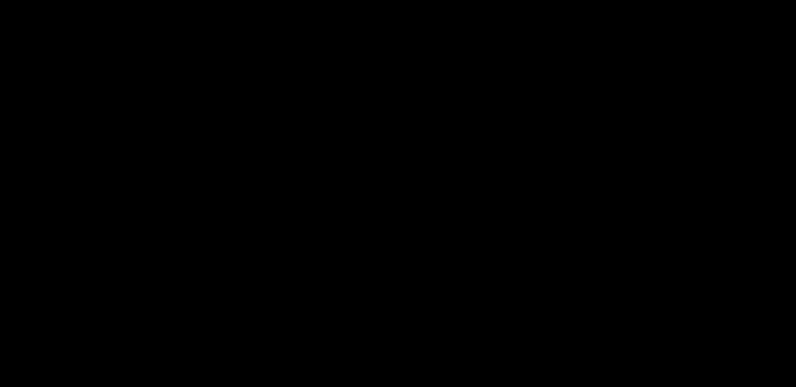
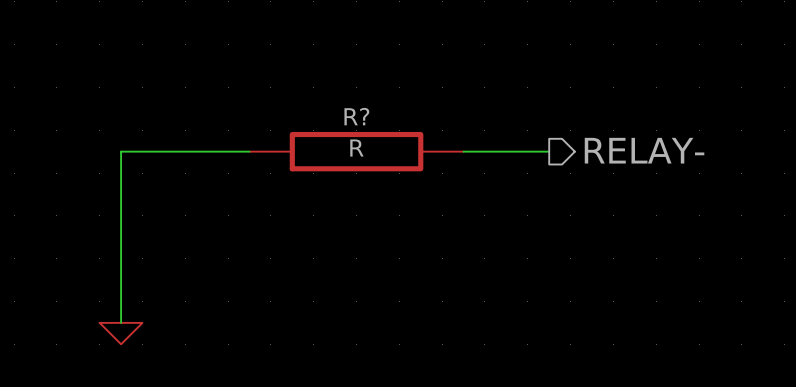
hierarchical label: none -> RELAY- (644, 150)
wire: none -> (249, 151) (121, 151) (121, 322)
R?: none -> R (356, 151)
wire: none -> (463, 151) (549, 151)
power symbol: none -> (121, 333)

